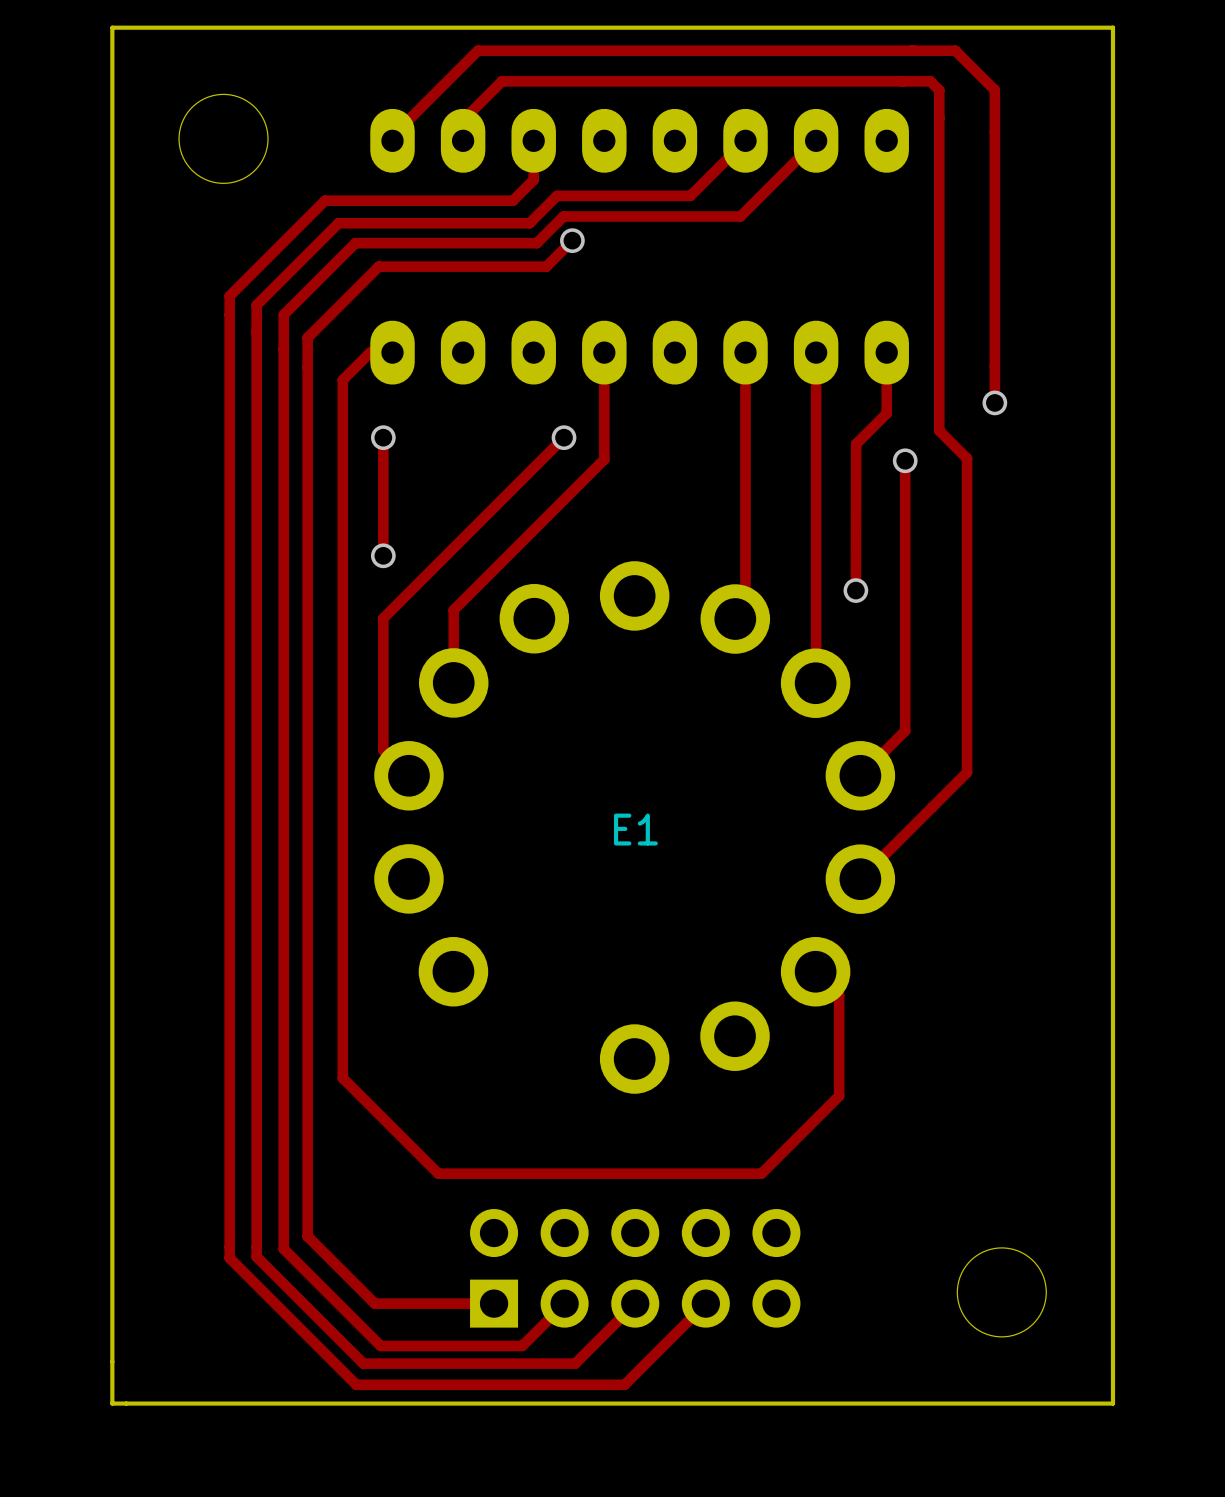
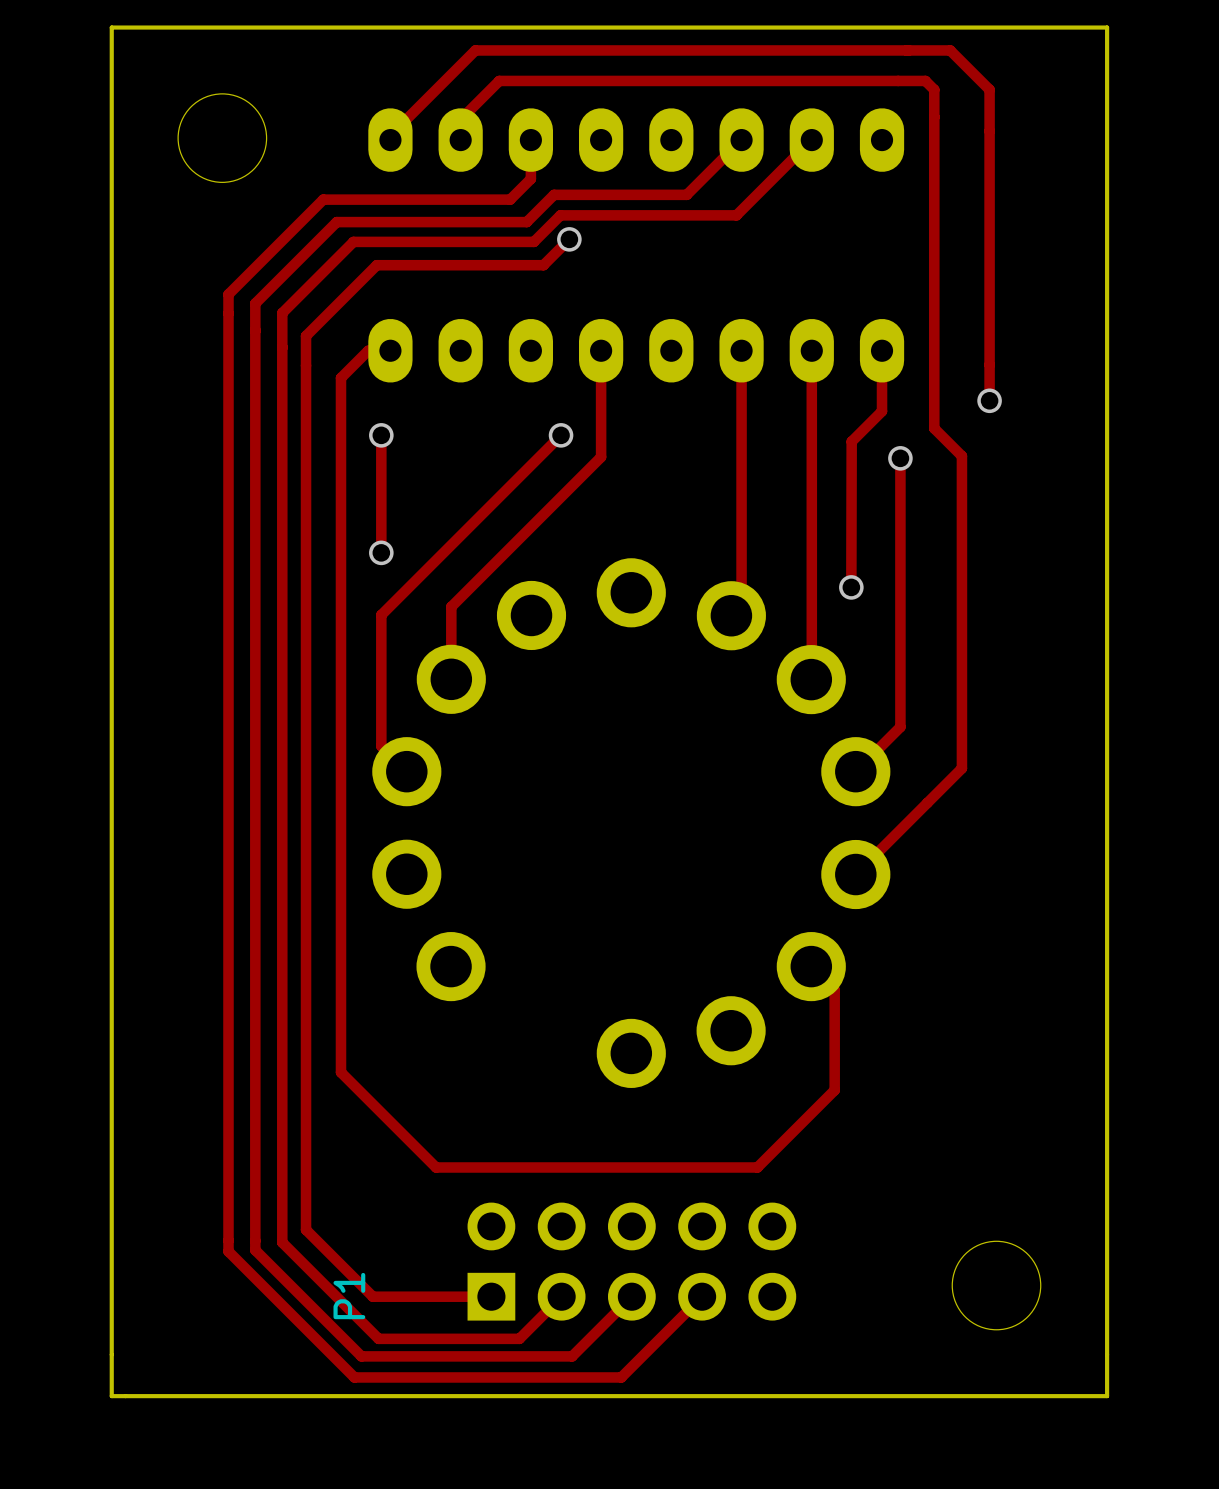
E1 name: E1 (635, 829) -> none
P1 name: none -> P1 (349, 1296)

